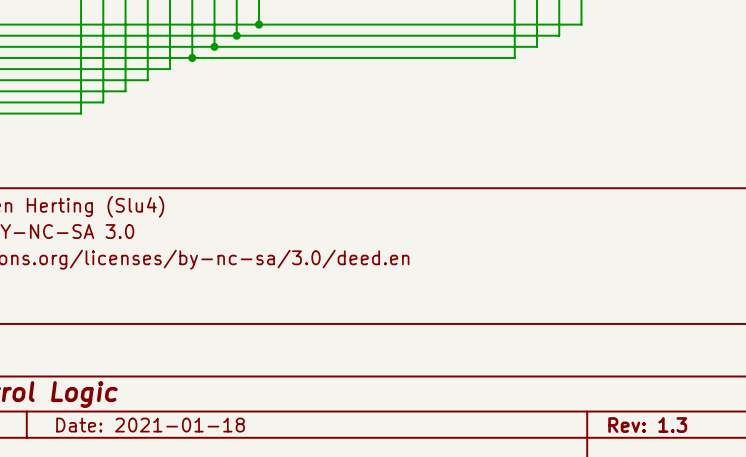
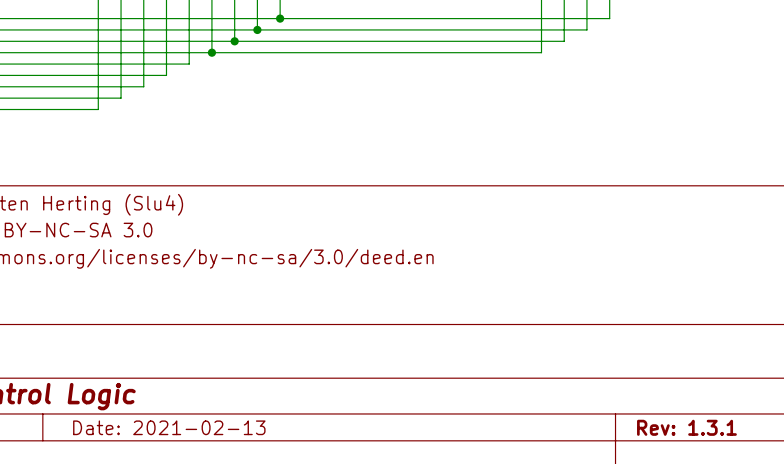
title block: Date: 2021-01-18 (150, 425) -> Date: 2021-02-13 (169, 427)
title block: Rev: 1.3 (647, 425) -> Rev: 1.3.1 (686, 427)

